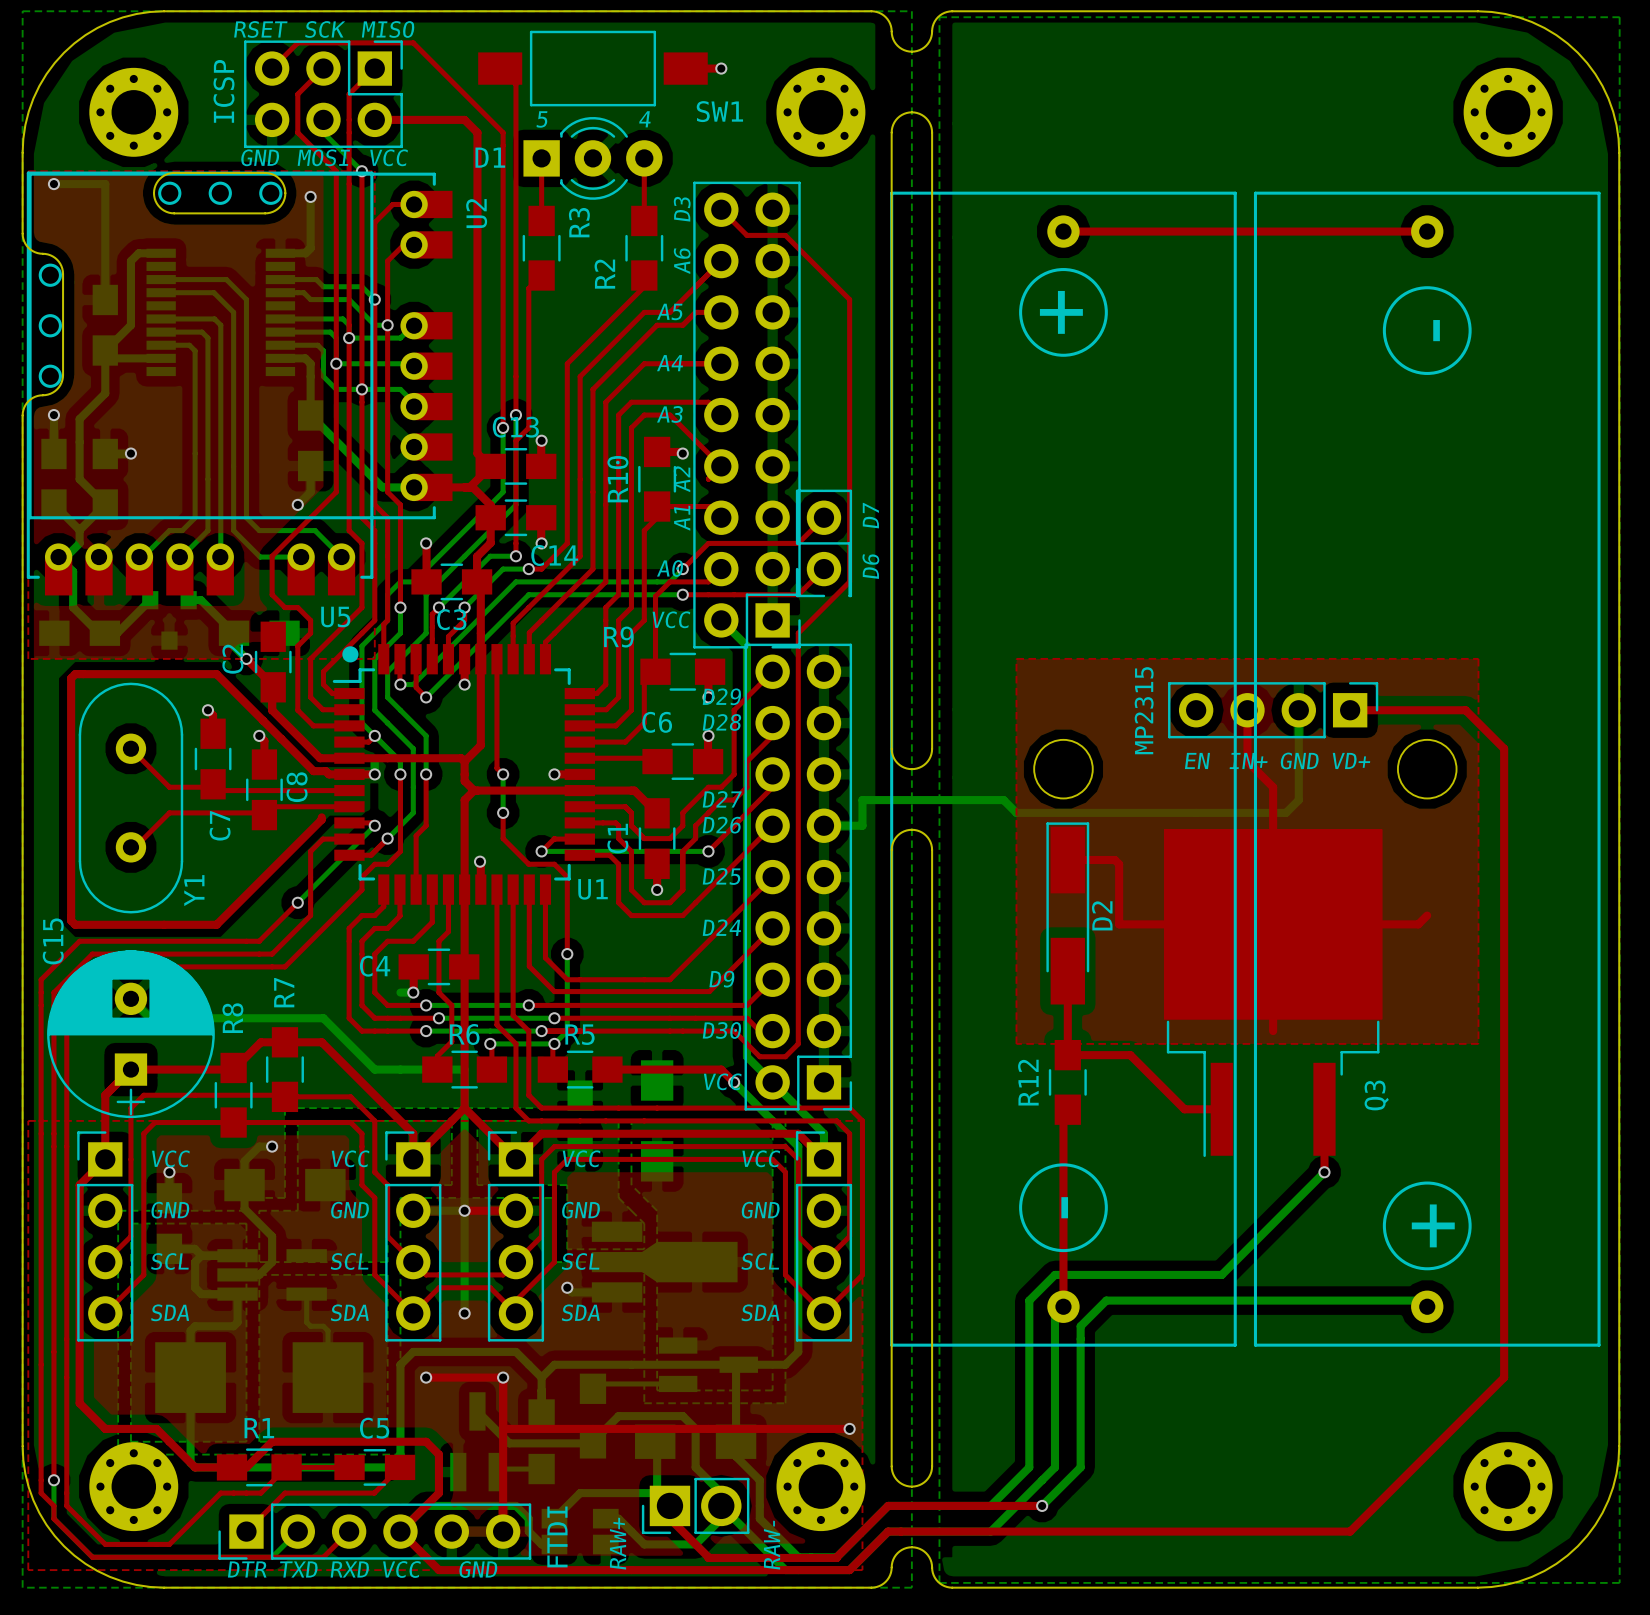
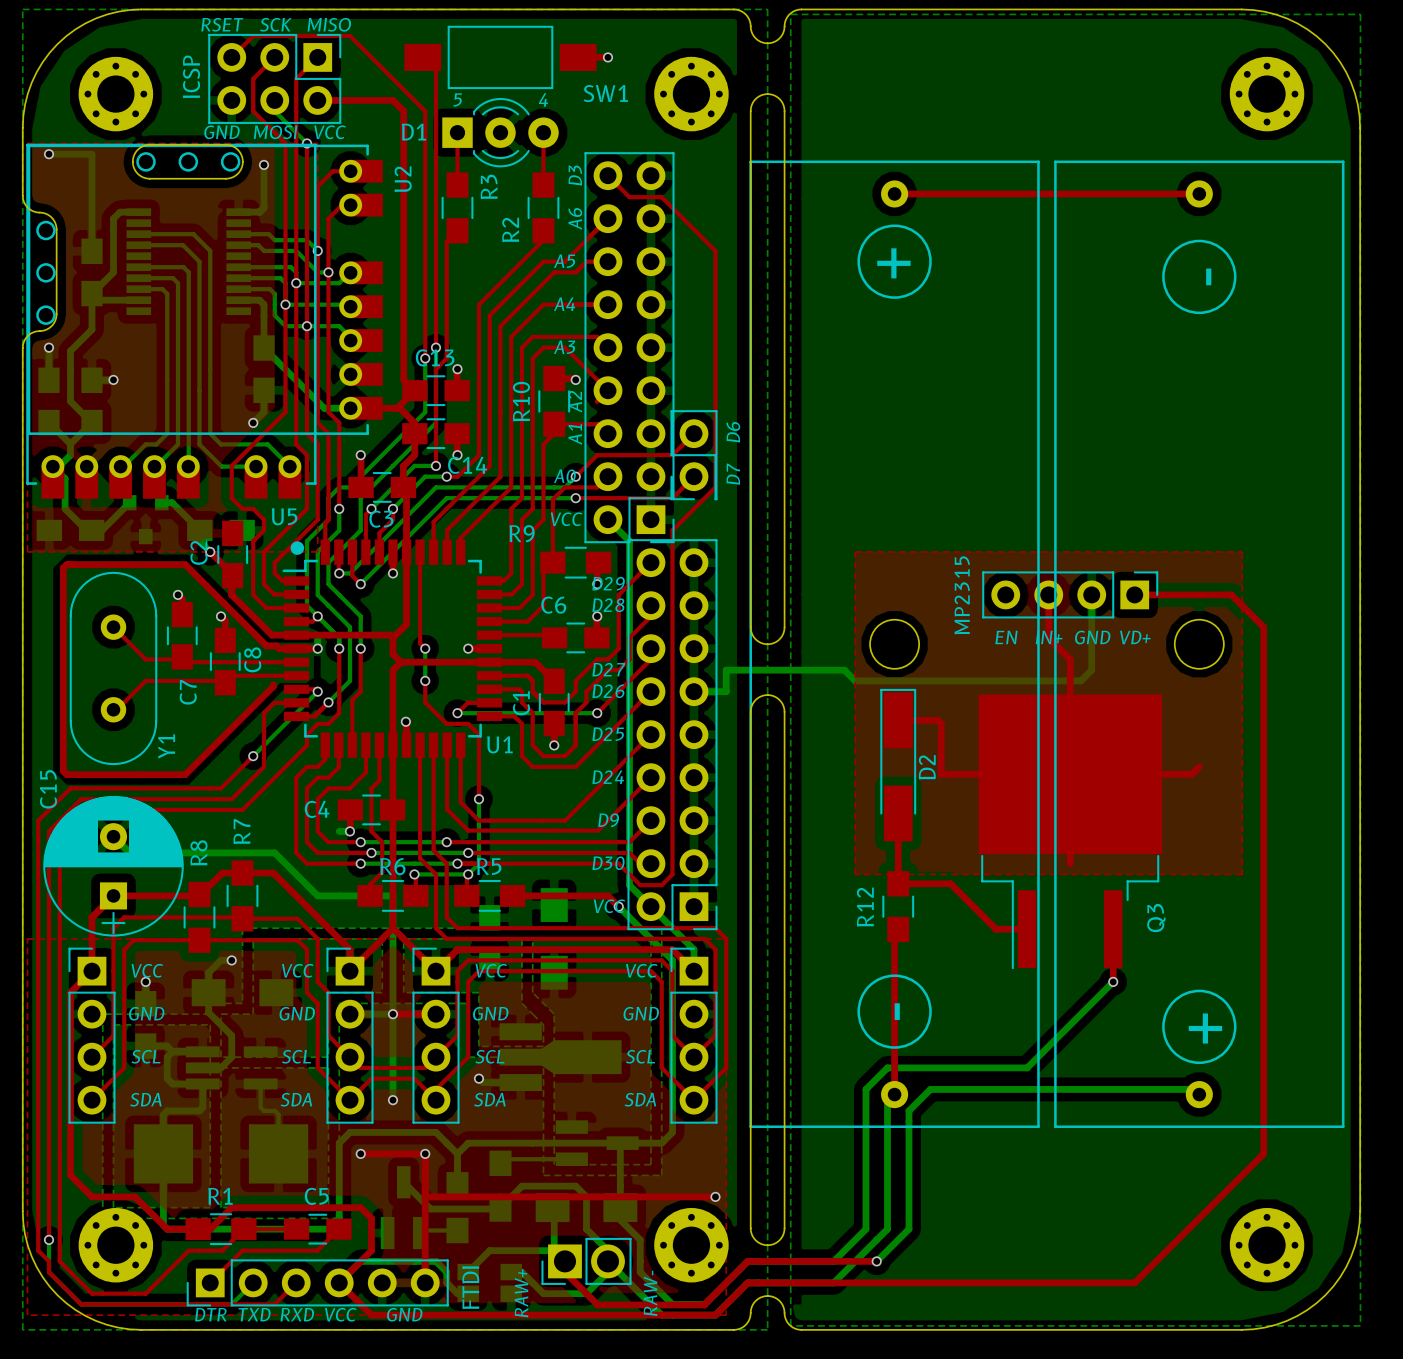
text: D7 (870, 515) -> D6 (733, 432)
text: D6 (870, 566) -> D7 (733, 474)

